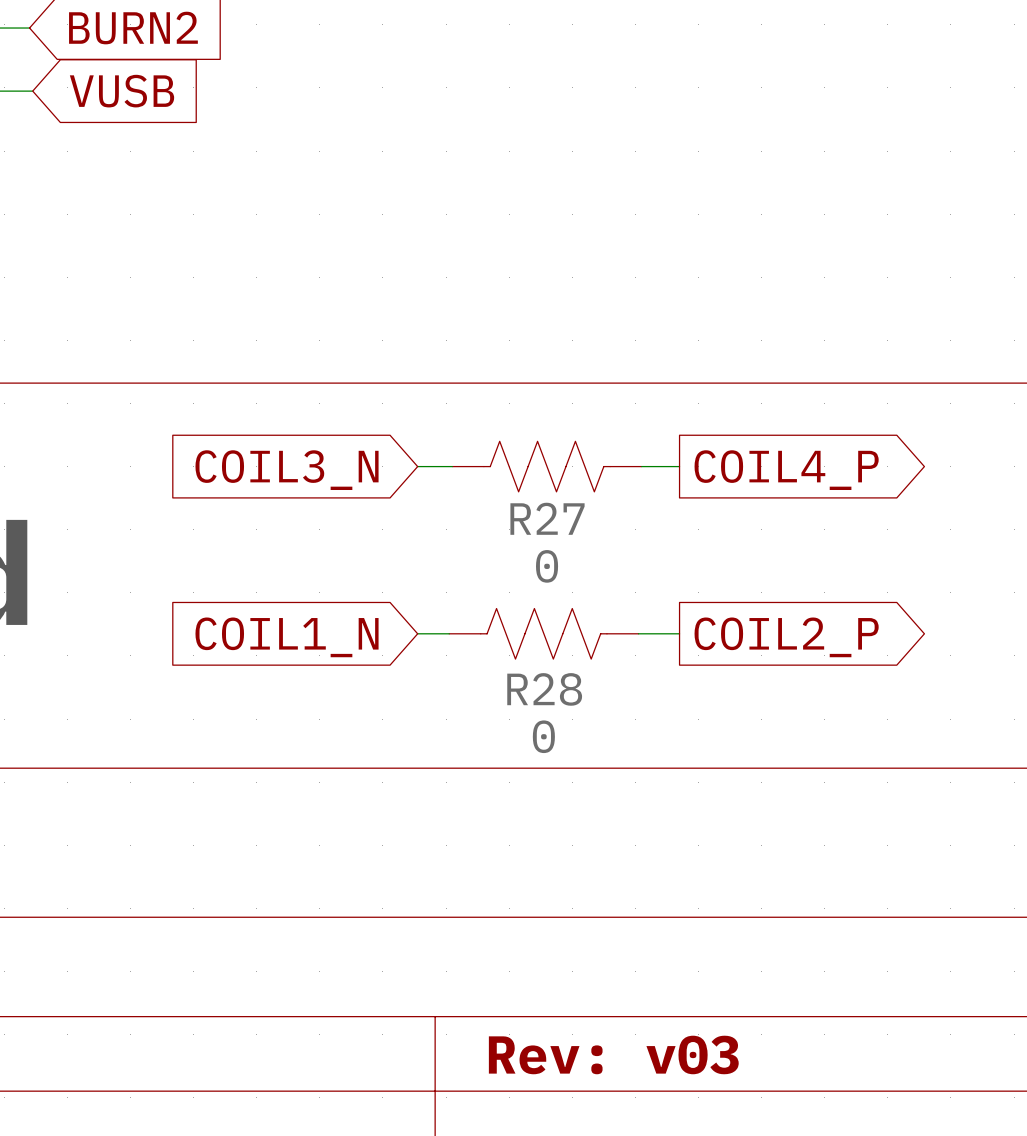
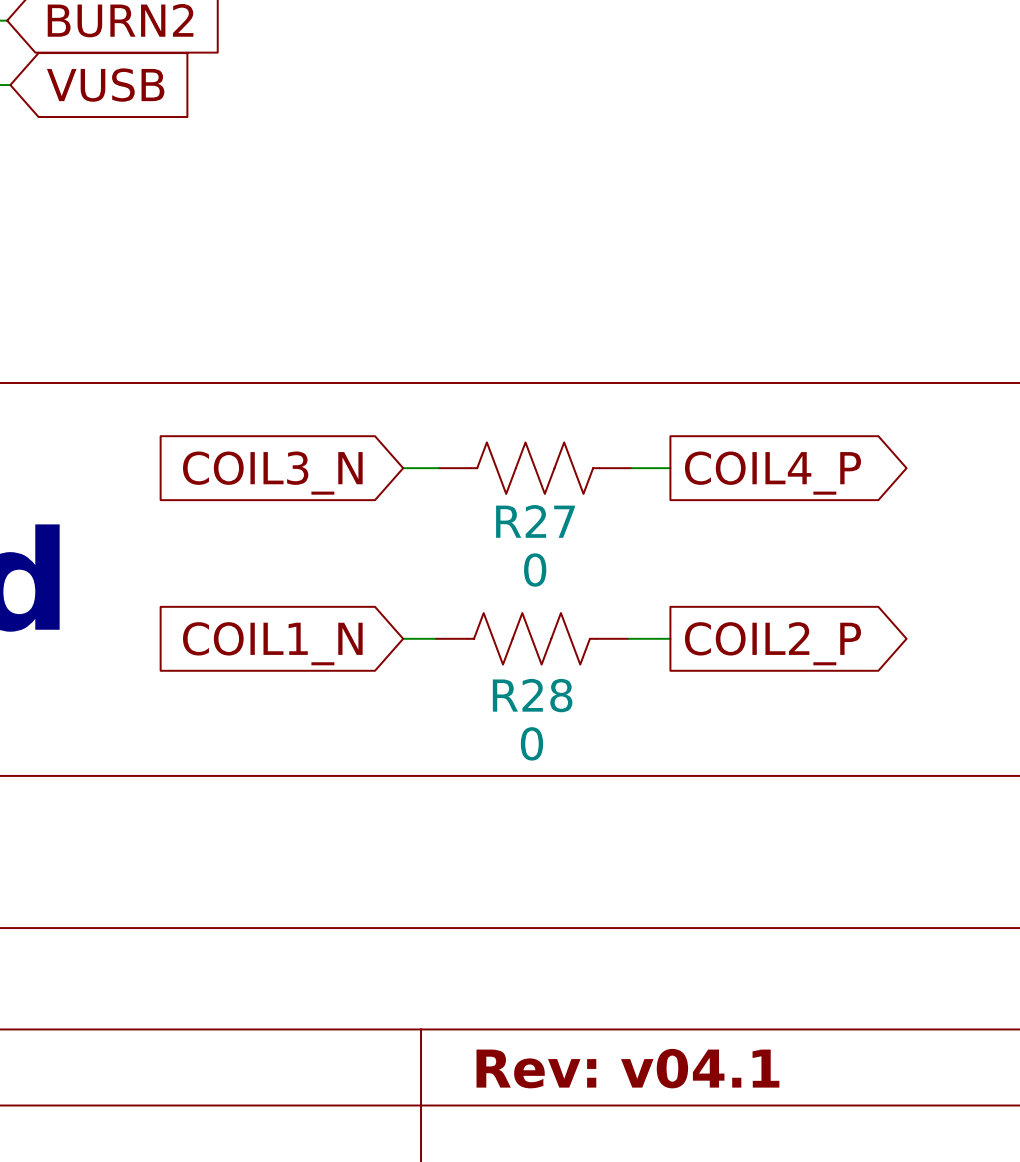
title block: Rev: v03 (613, 1054) -> Rev: v04.1 (627, 1068)

